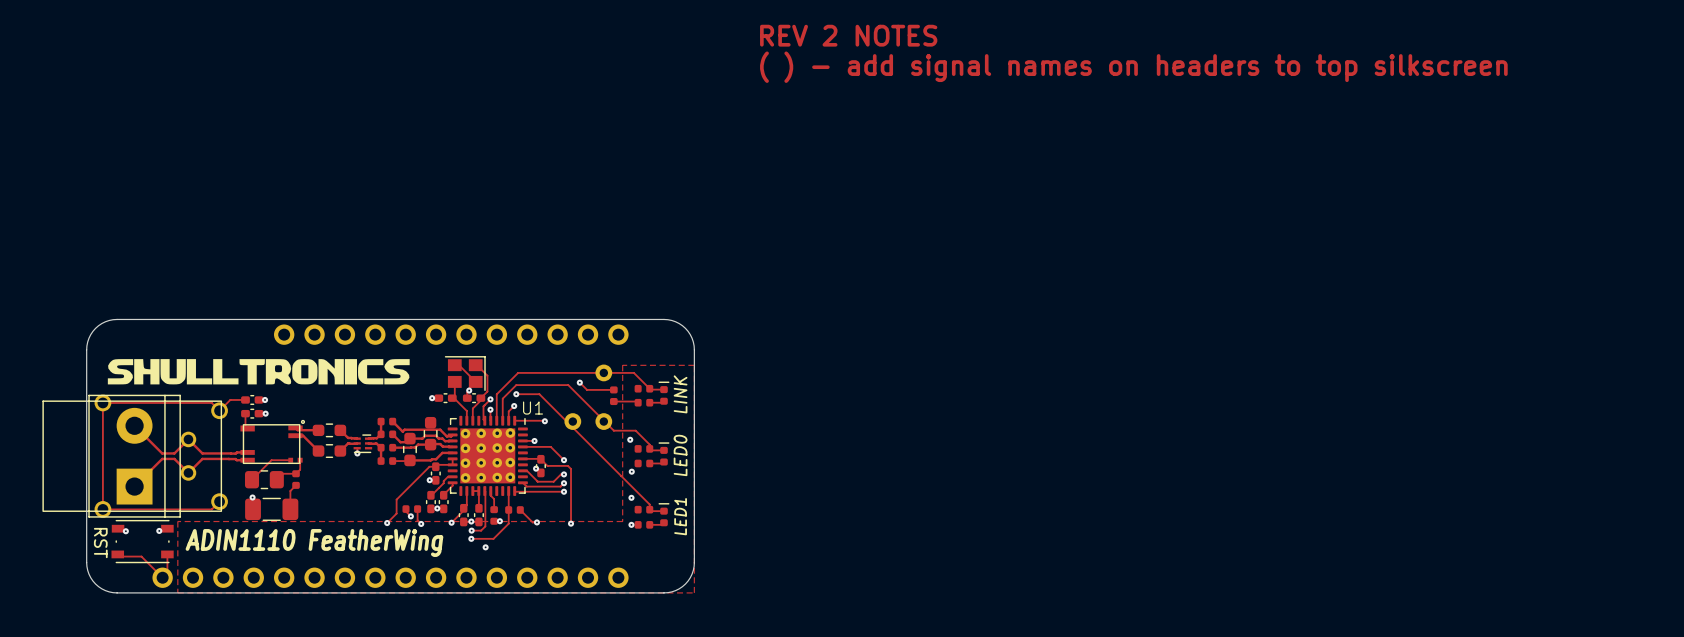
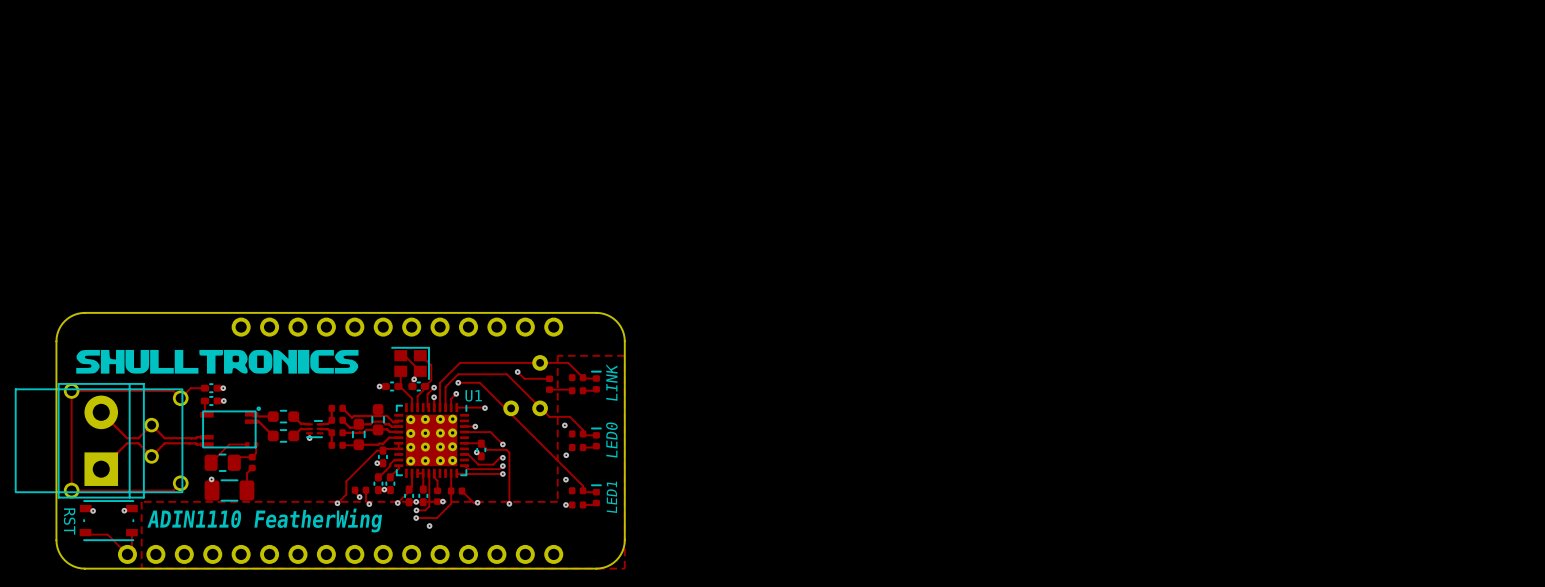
text: REV 2 NOTES (848, 35) -> none
text: ( ) - add signal names on headers to top silkscreen (1133, 67) -> none

